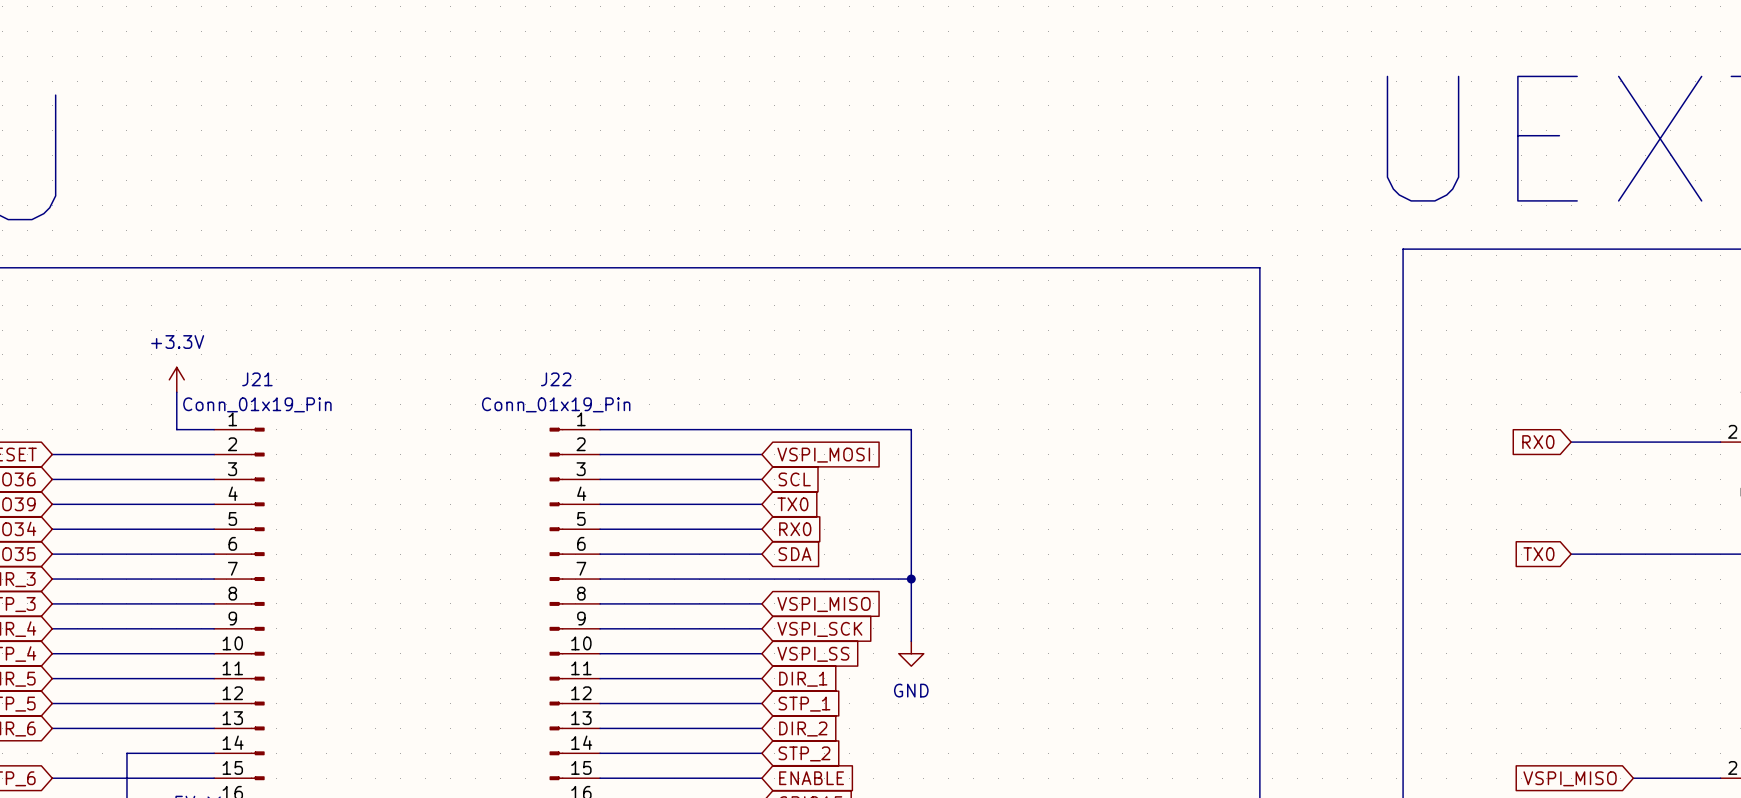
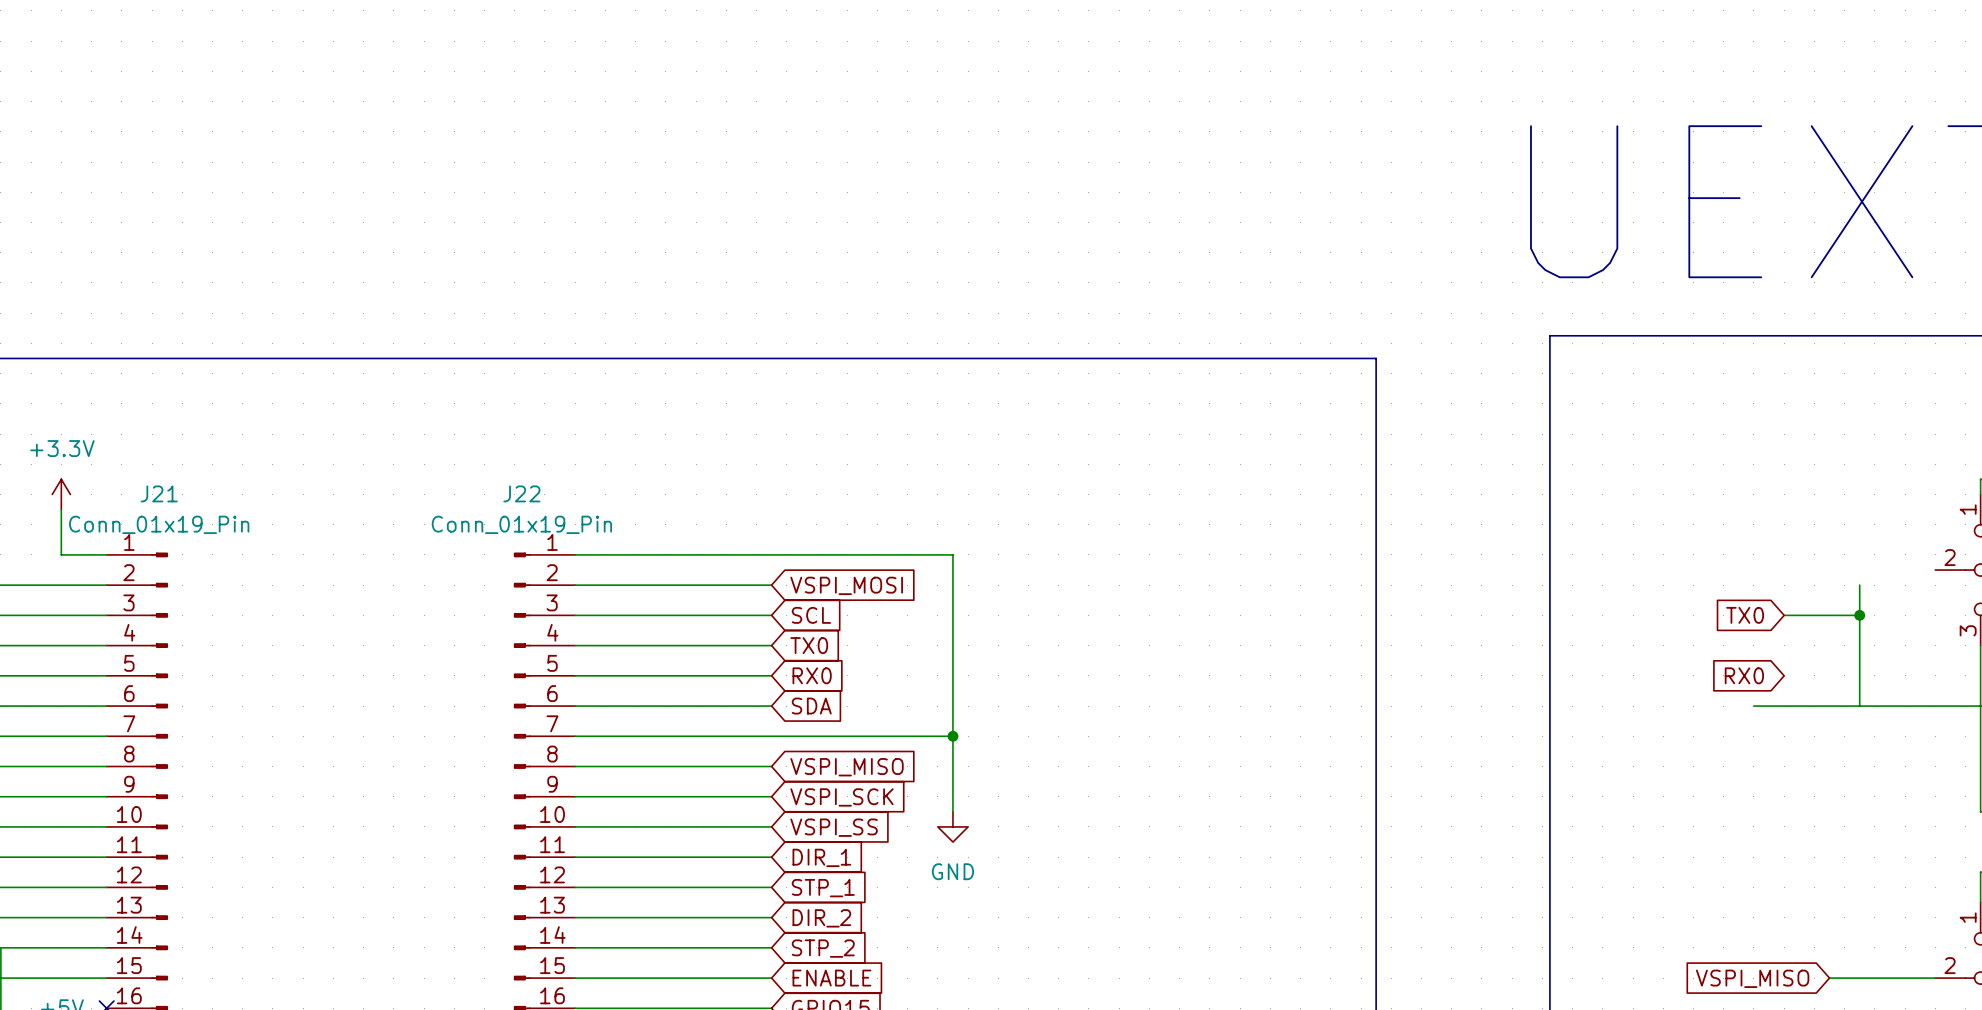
global label position: RX0 (1538, 442) -> RX0 (1744, 675)
wire: (1571, 442) (1720, 442) -> none
wire: none -> (1859, 585) (1859, 706)
wire: none -> (1784, 615) (1859, 615)
junction: none -> (1859, 615)
global label position: TX0 (1538, 554) -> TX0 (1745, 615)

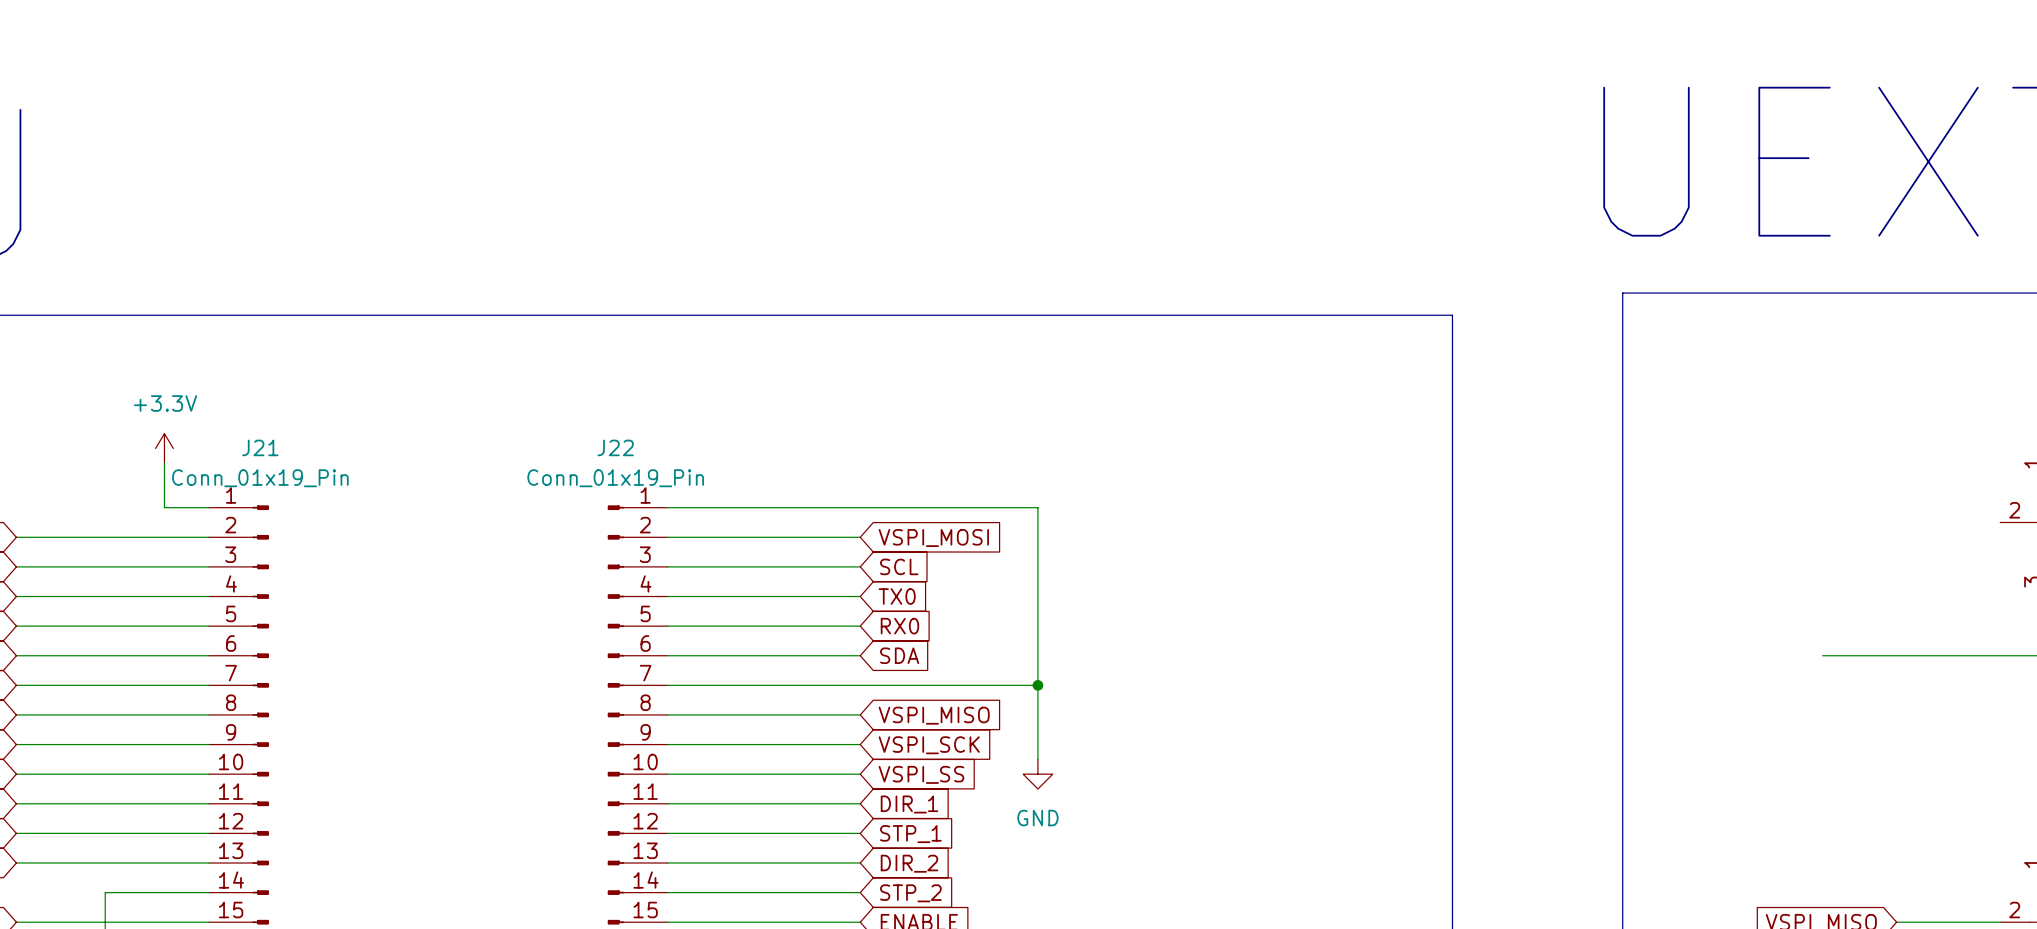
wire: (1859, 585) (1859, 706) -> none
global label: TX0 (1745, 615) -> none
wire: (1784, 615) (1859, 615) -> none
junction: (1859, 615) -> none
global label: RX0 (1744, 675) -> none

